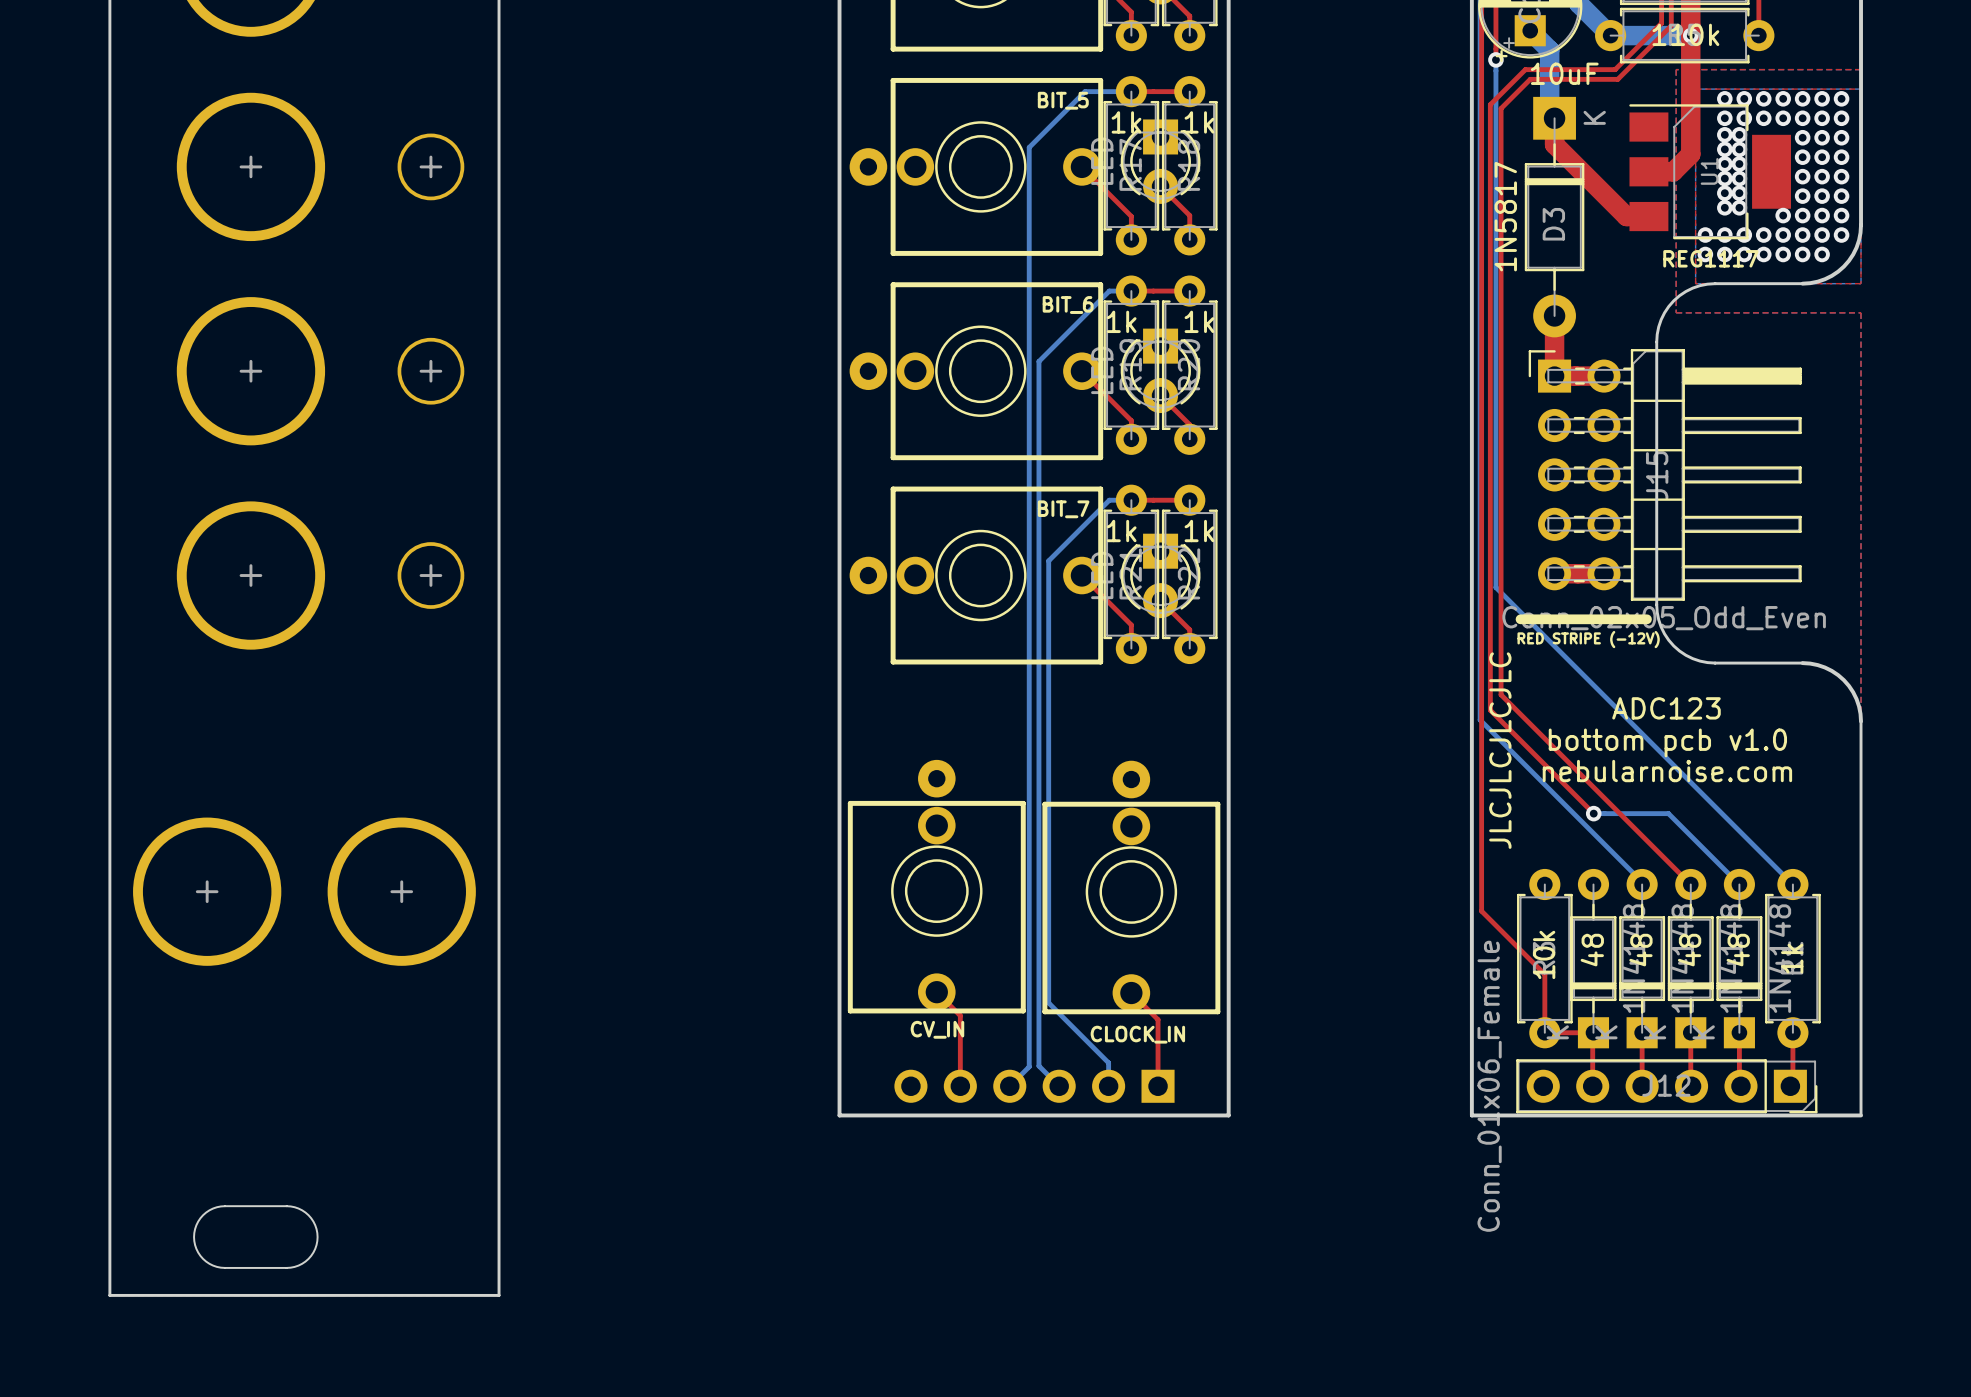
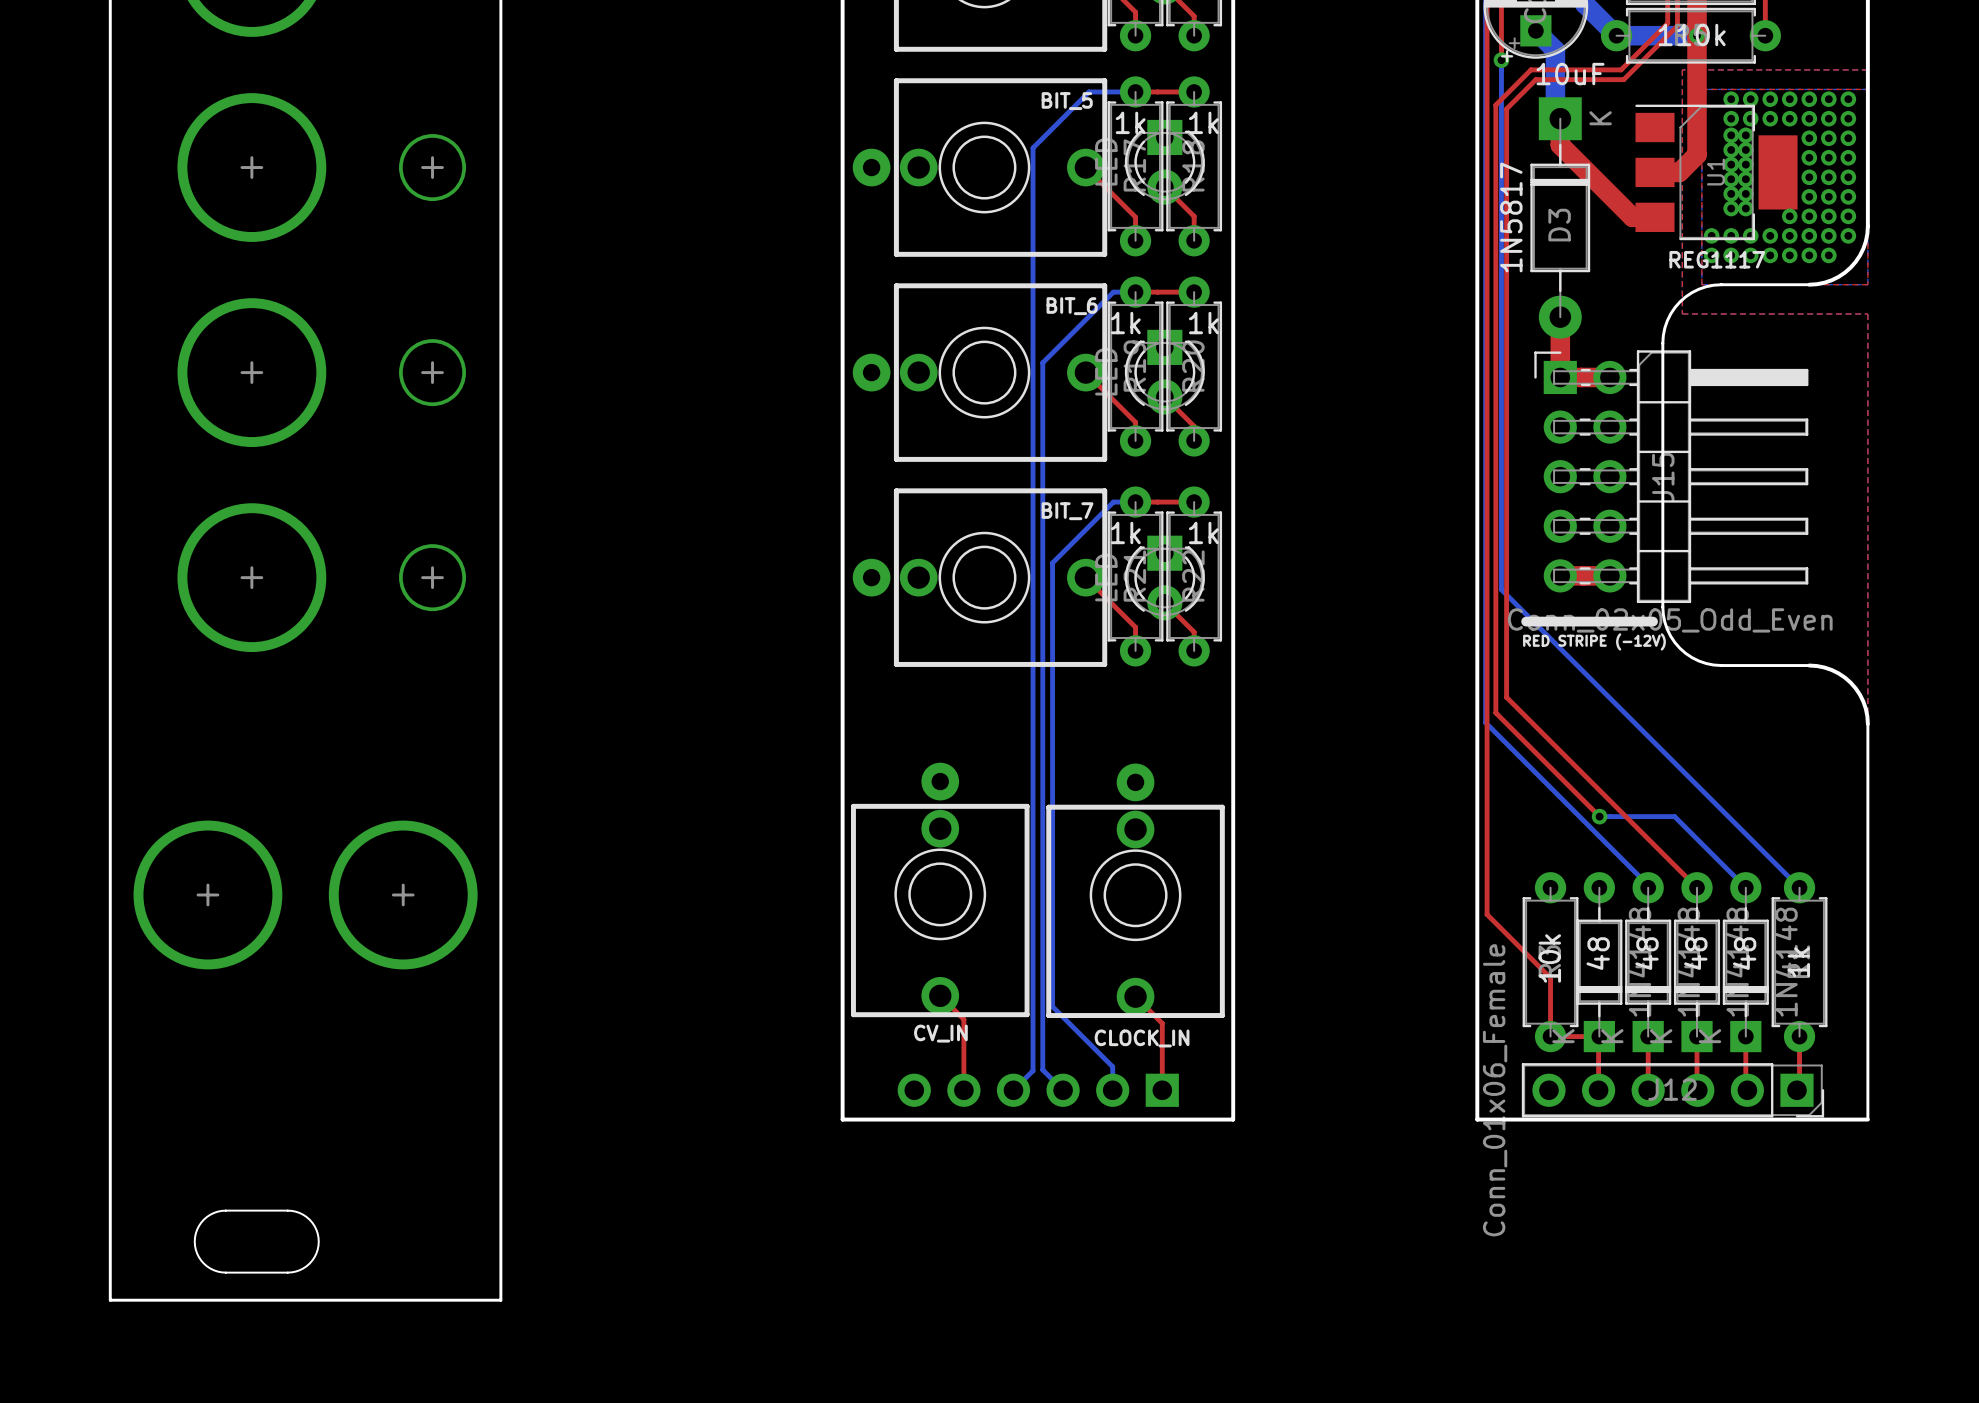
text: ADC123 (1666, 708) -> none
text: bottom pcb v1.0 (1667, 742) -> none
text: JLCJLCJLCJLC (1500, 750) -> none
text: nebularnoise.com (1667, 771) -> none

